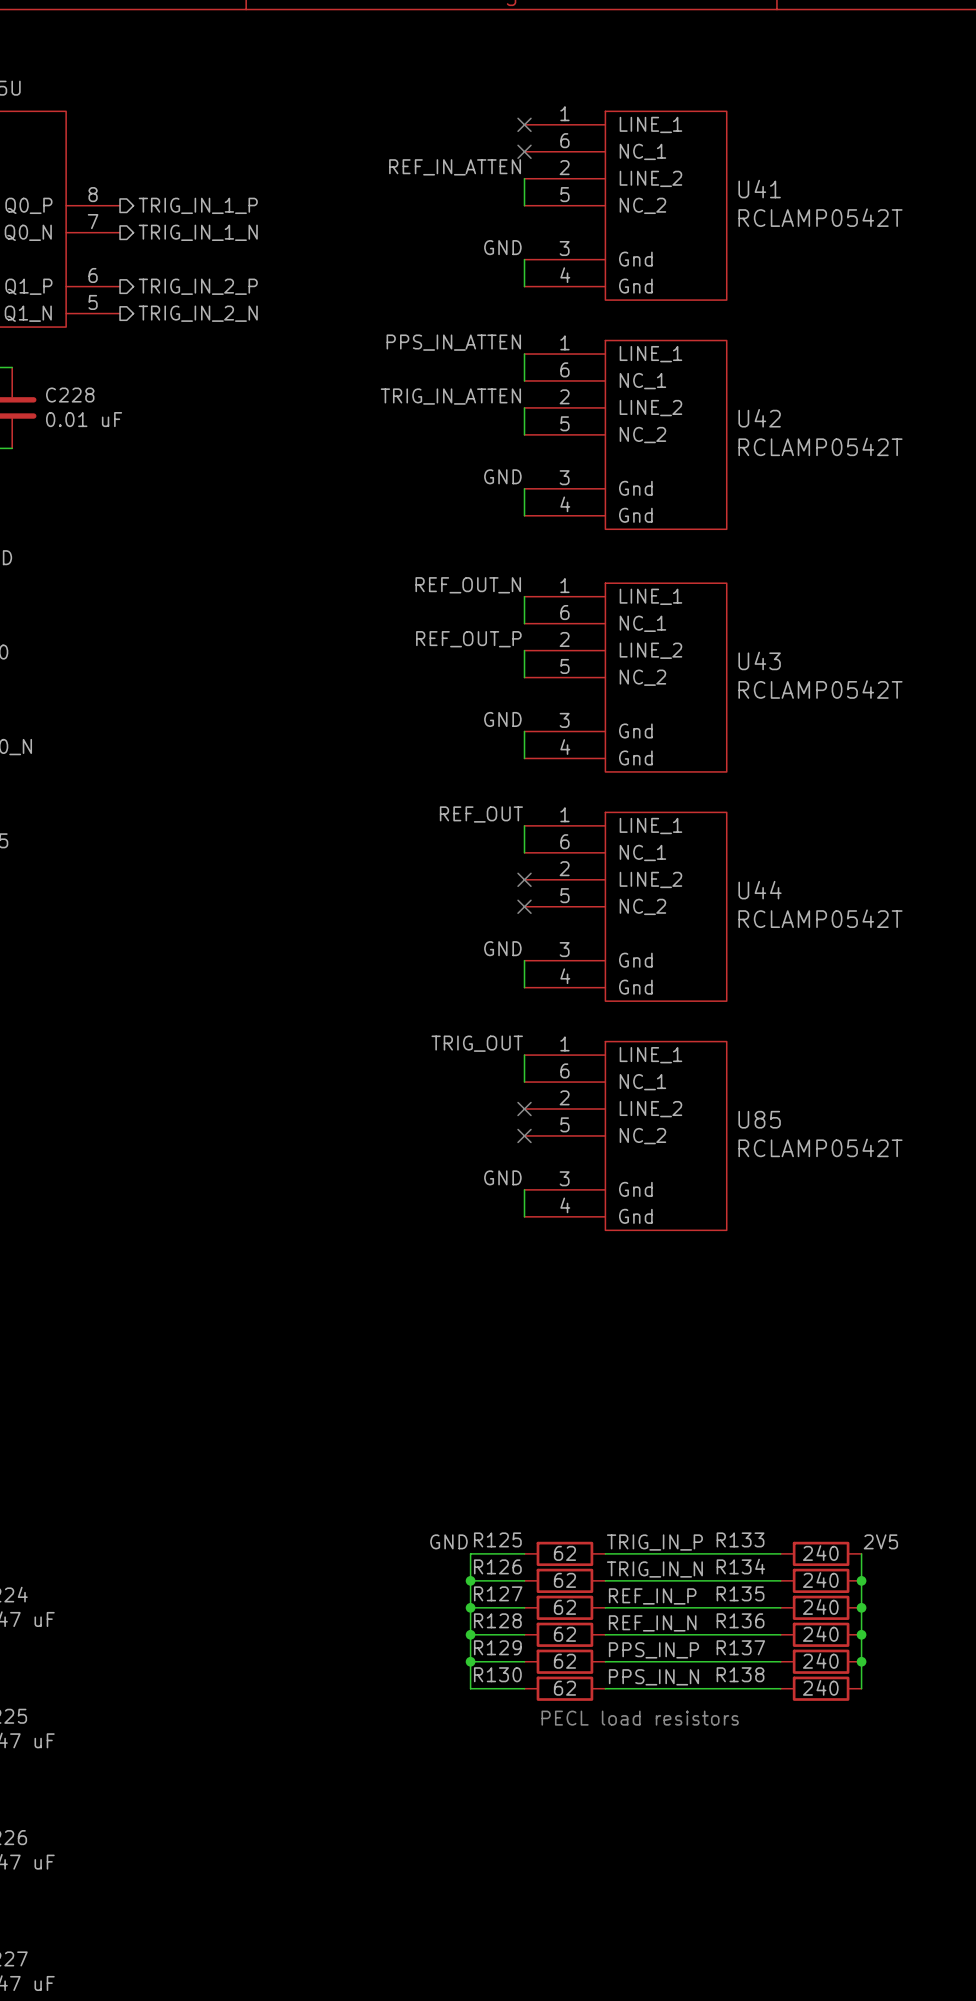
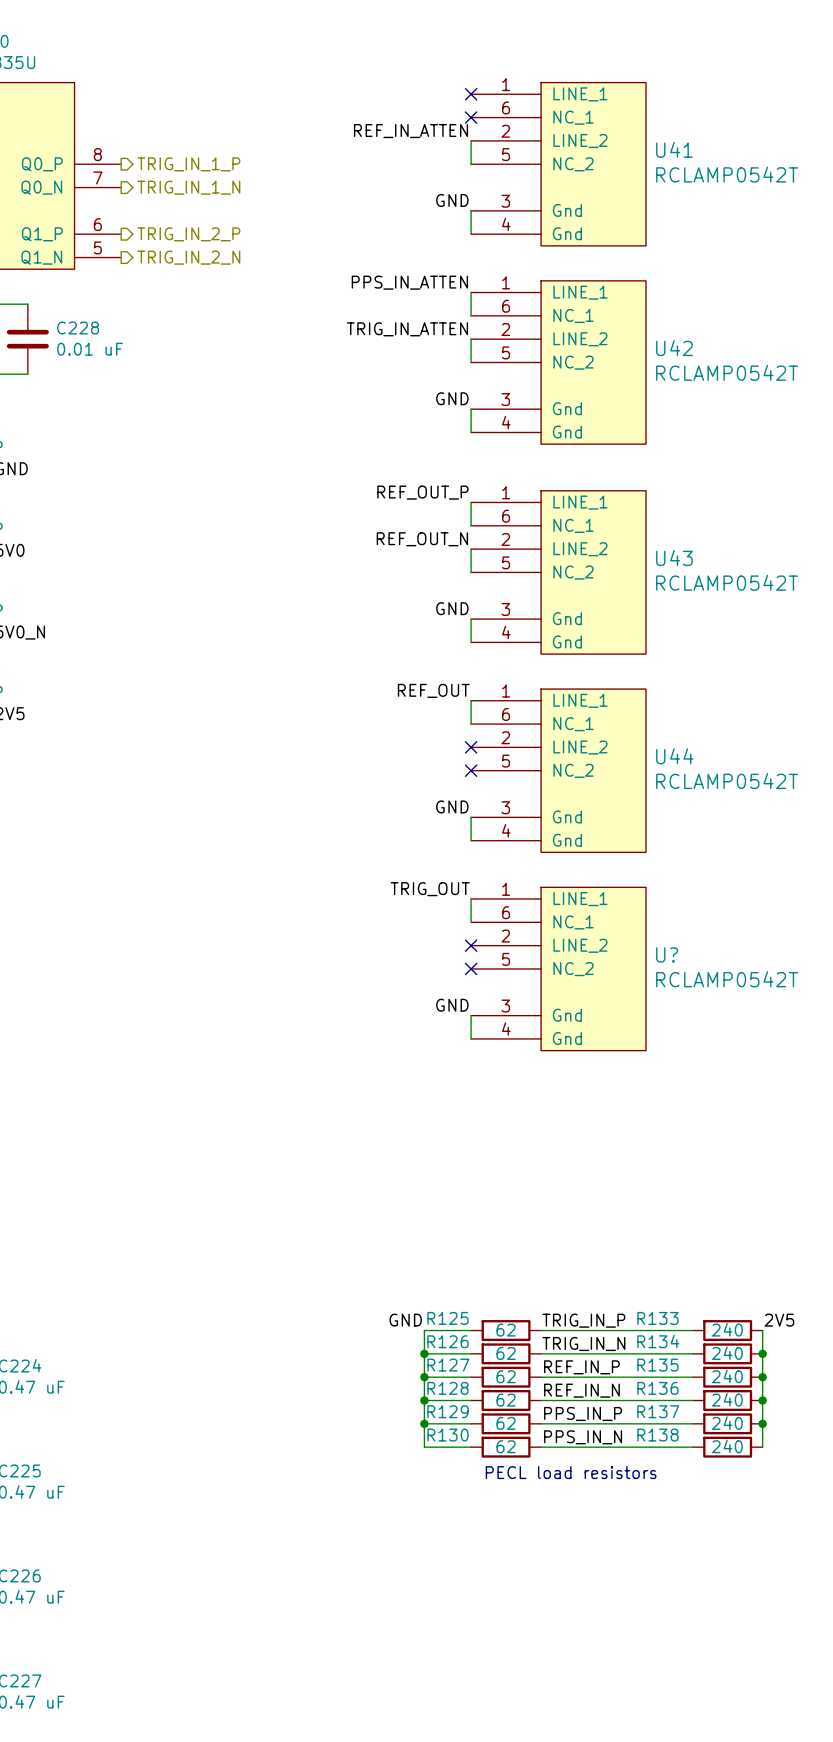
label: REF_OUT_N (468, 585) -> REF_OUT_P (422, 492)
label: REF_OUT_P (468, 639) -> REF_OUT_N (422, 539)
U85 name: U85 (759, 1119) -> U? (667, 954)

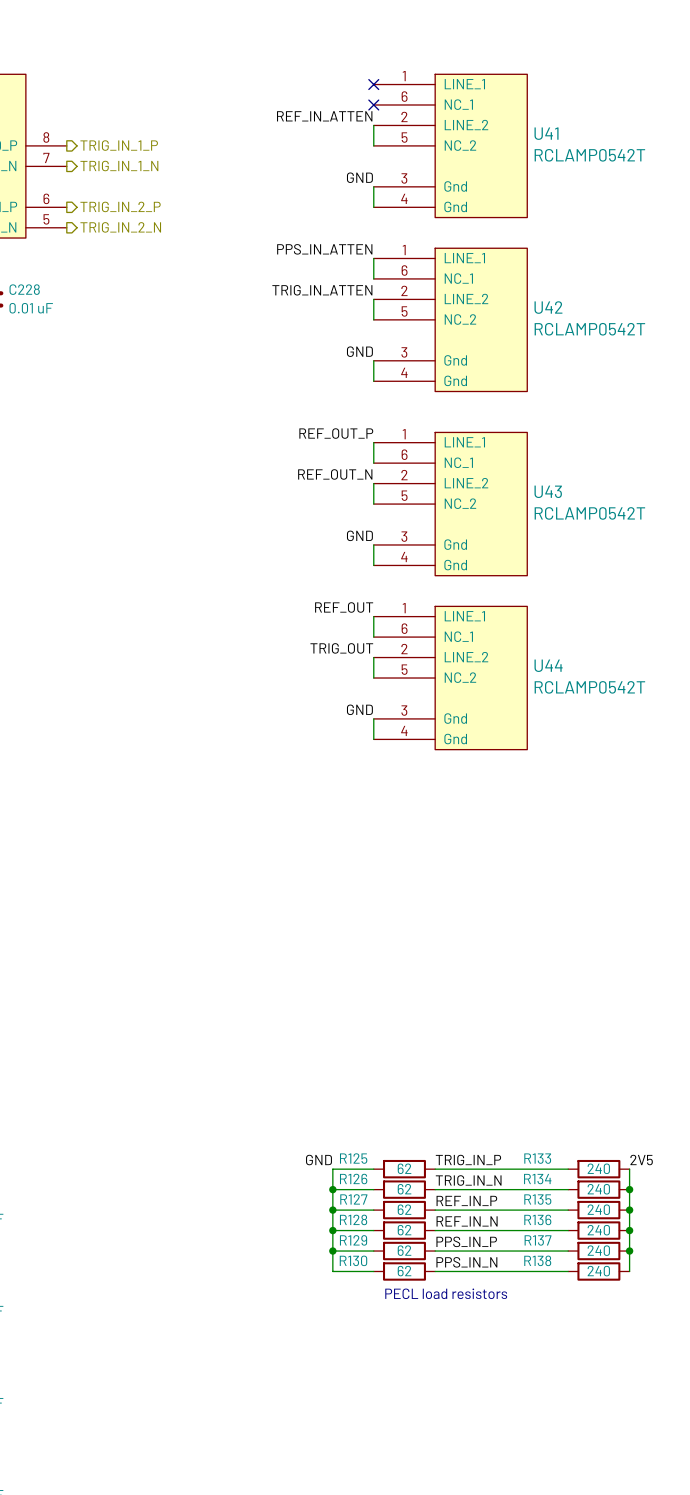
no-connect mark: (471, 747) -> none
no-connect mark: (471, 770) -> none
label position: TRIG_OUT (430, 889) -> TRIG_OUT (341, 648)
wire: (471, 899) (471, 922) -> (373, 657) (373, 678)
no-connect mark: (471, 945) -> none
no-connect mark: (471, 968) -> none
U?: RCLAMP0542T (558, 968) -> none
label: GND (452, 1005) -> none
wire: (471, 1015) (471, 1038) -> none

